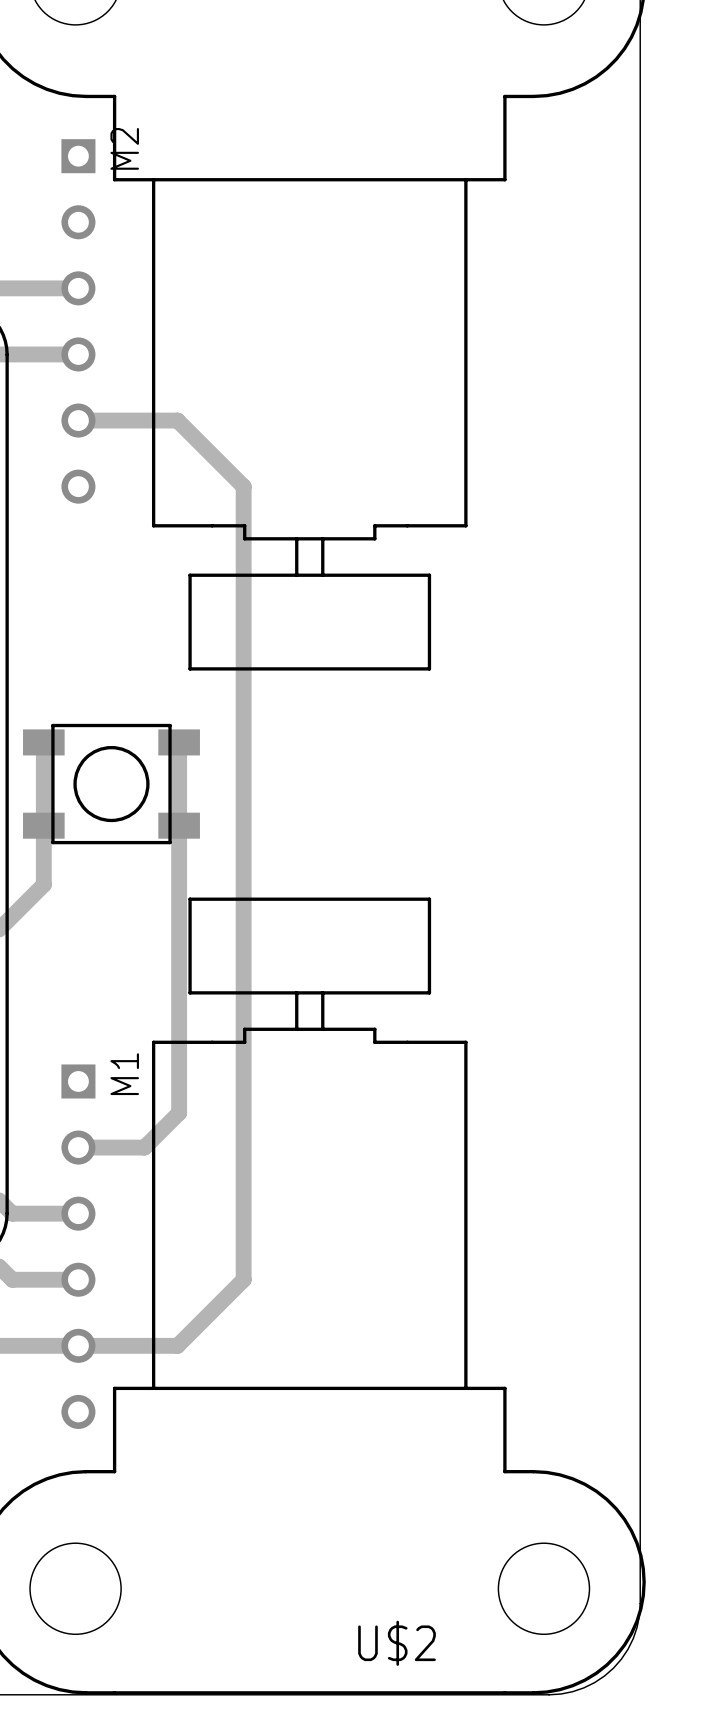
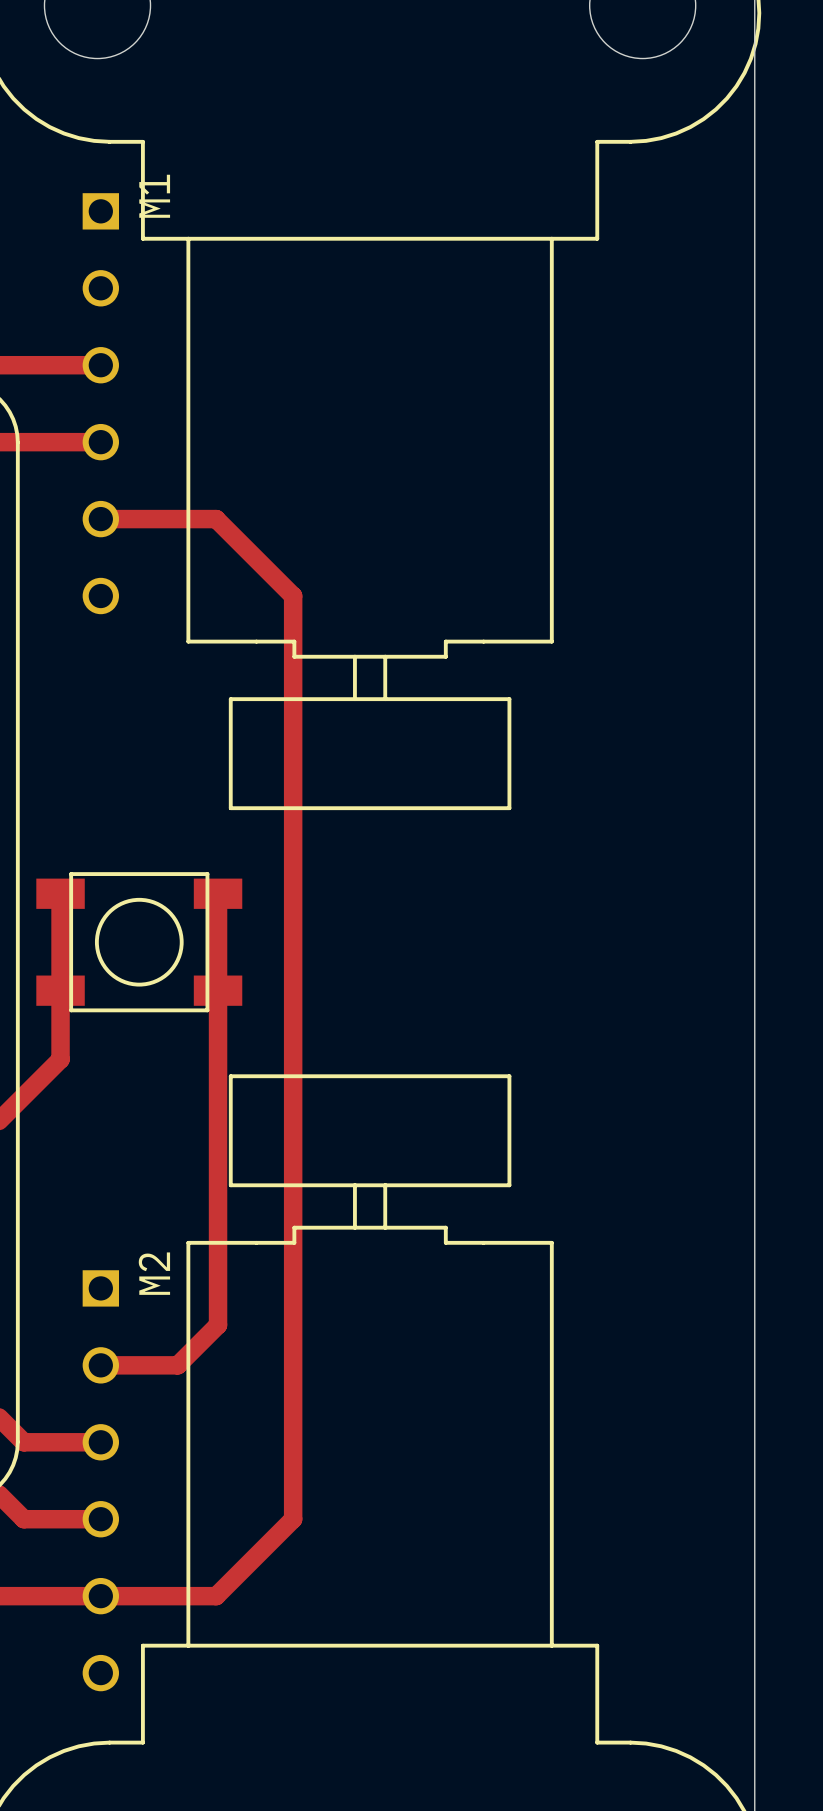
M2 footprint: [61, 139, 96, 504] -> [82, 1270, 120, 1692]
M1 footprint: [61, 1064, 96, 1429] -> [82, 193, 120, 615]

